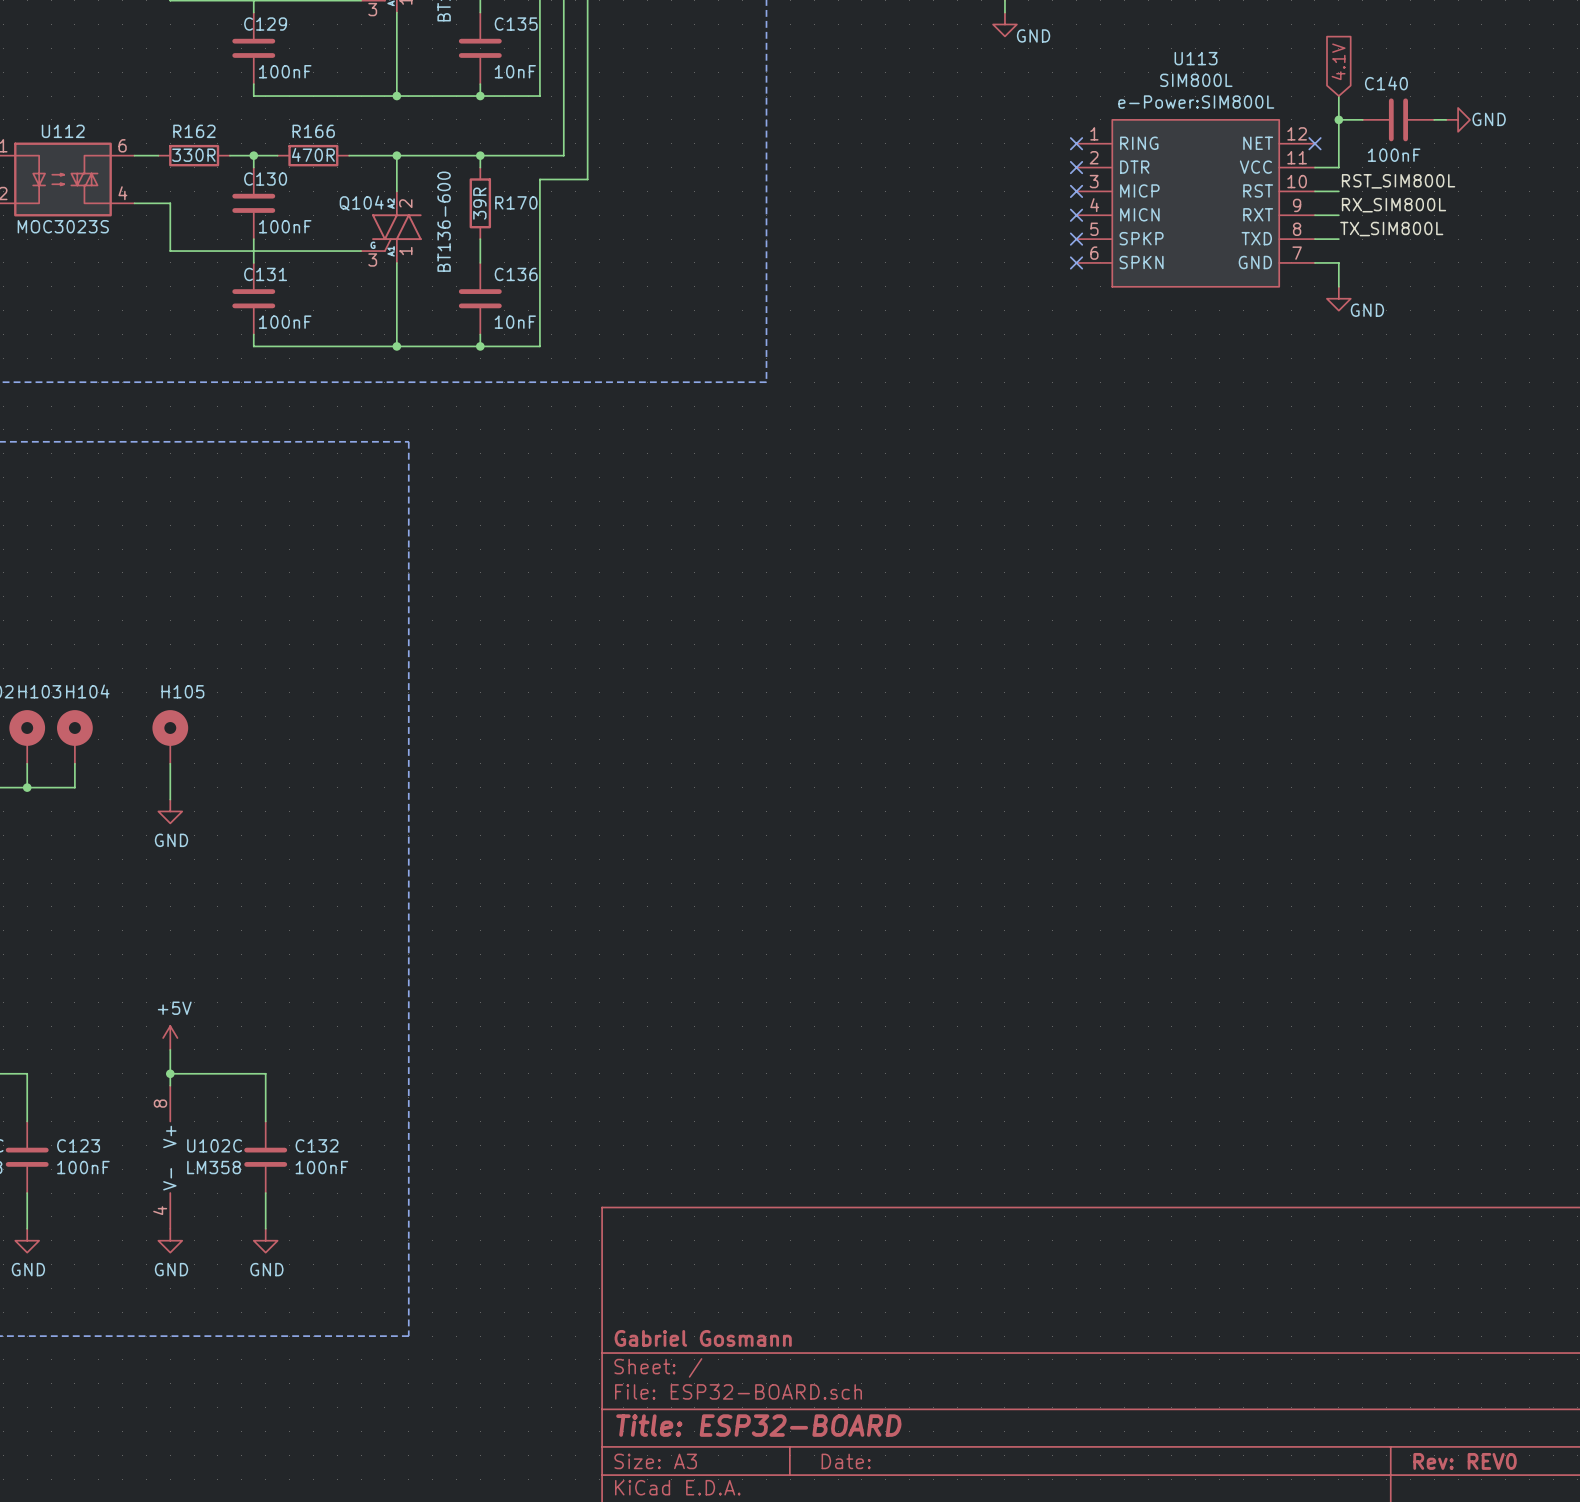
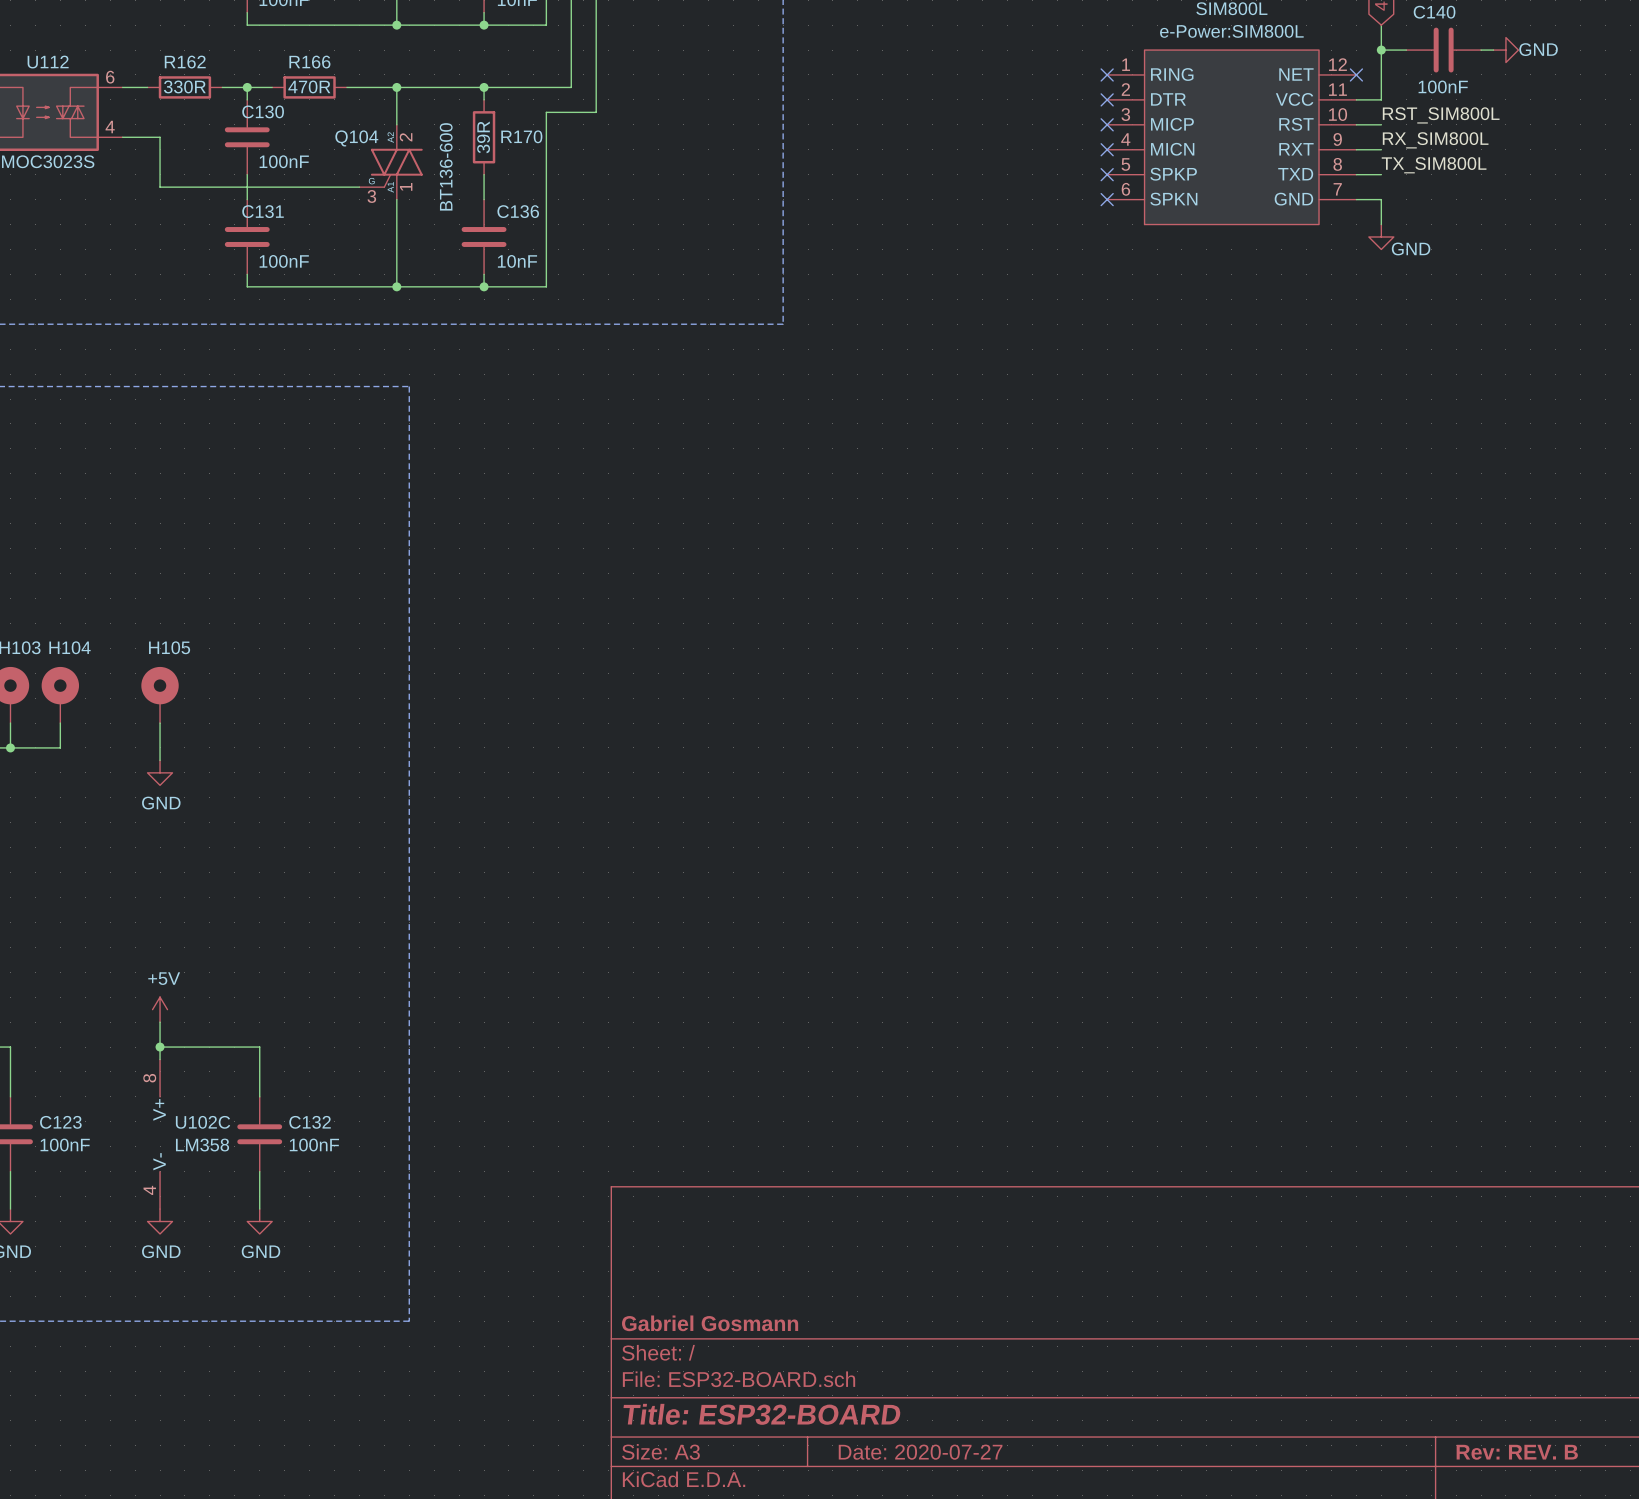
title block: Date: (846, 1461) -> Date: 2020-07-27 (920, 1452)
title block: Rev: REV0 (1465, 1461) -> Rev: REV. B (1517, 1452)

